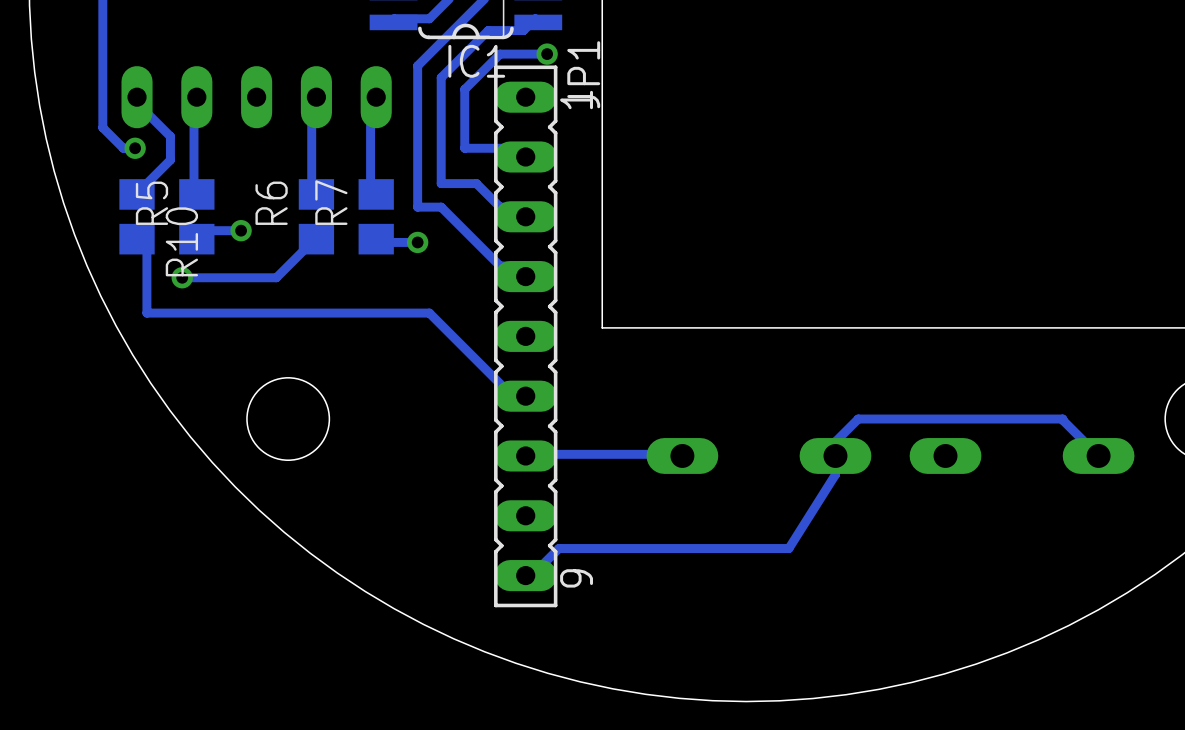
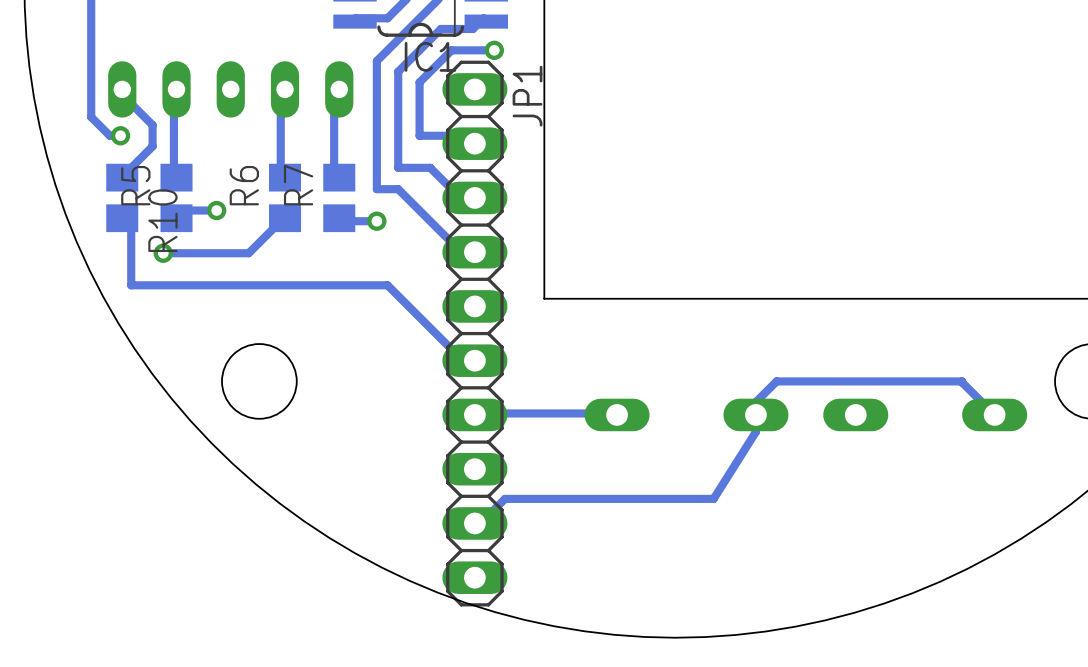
JP1 footprint: [494, 65, 558, 608] -> [442, 60, 508, 607]

